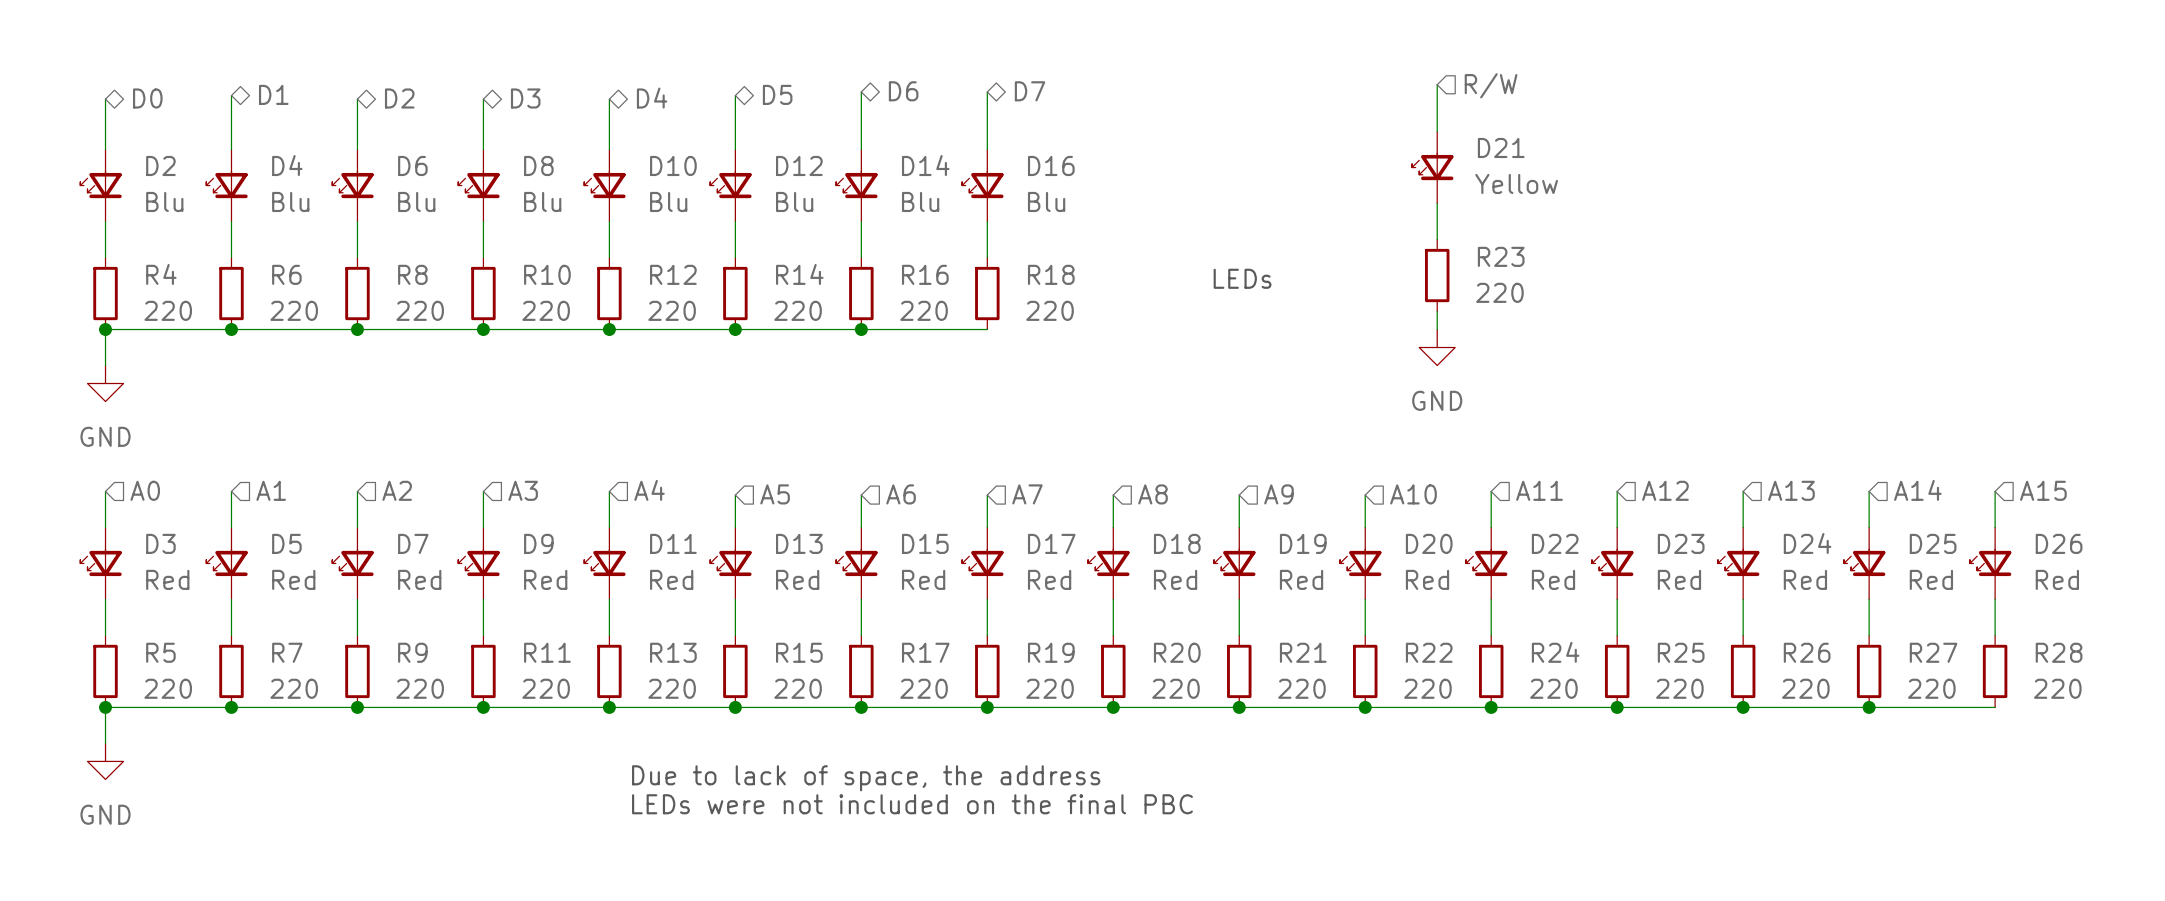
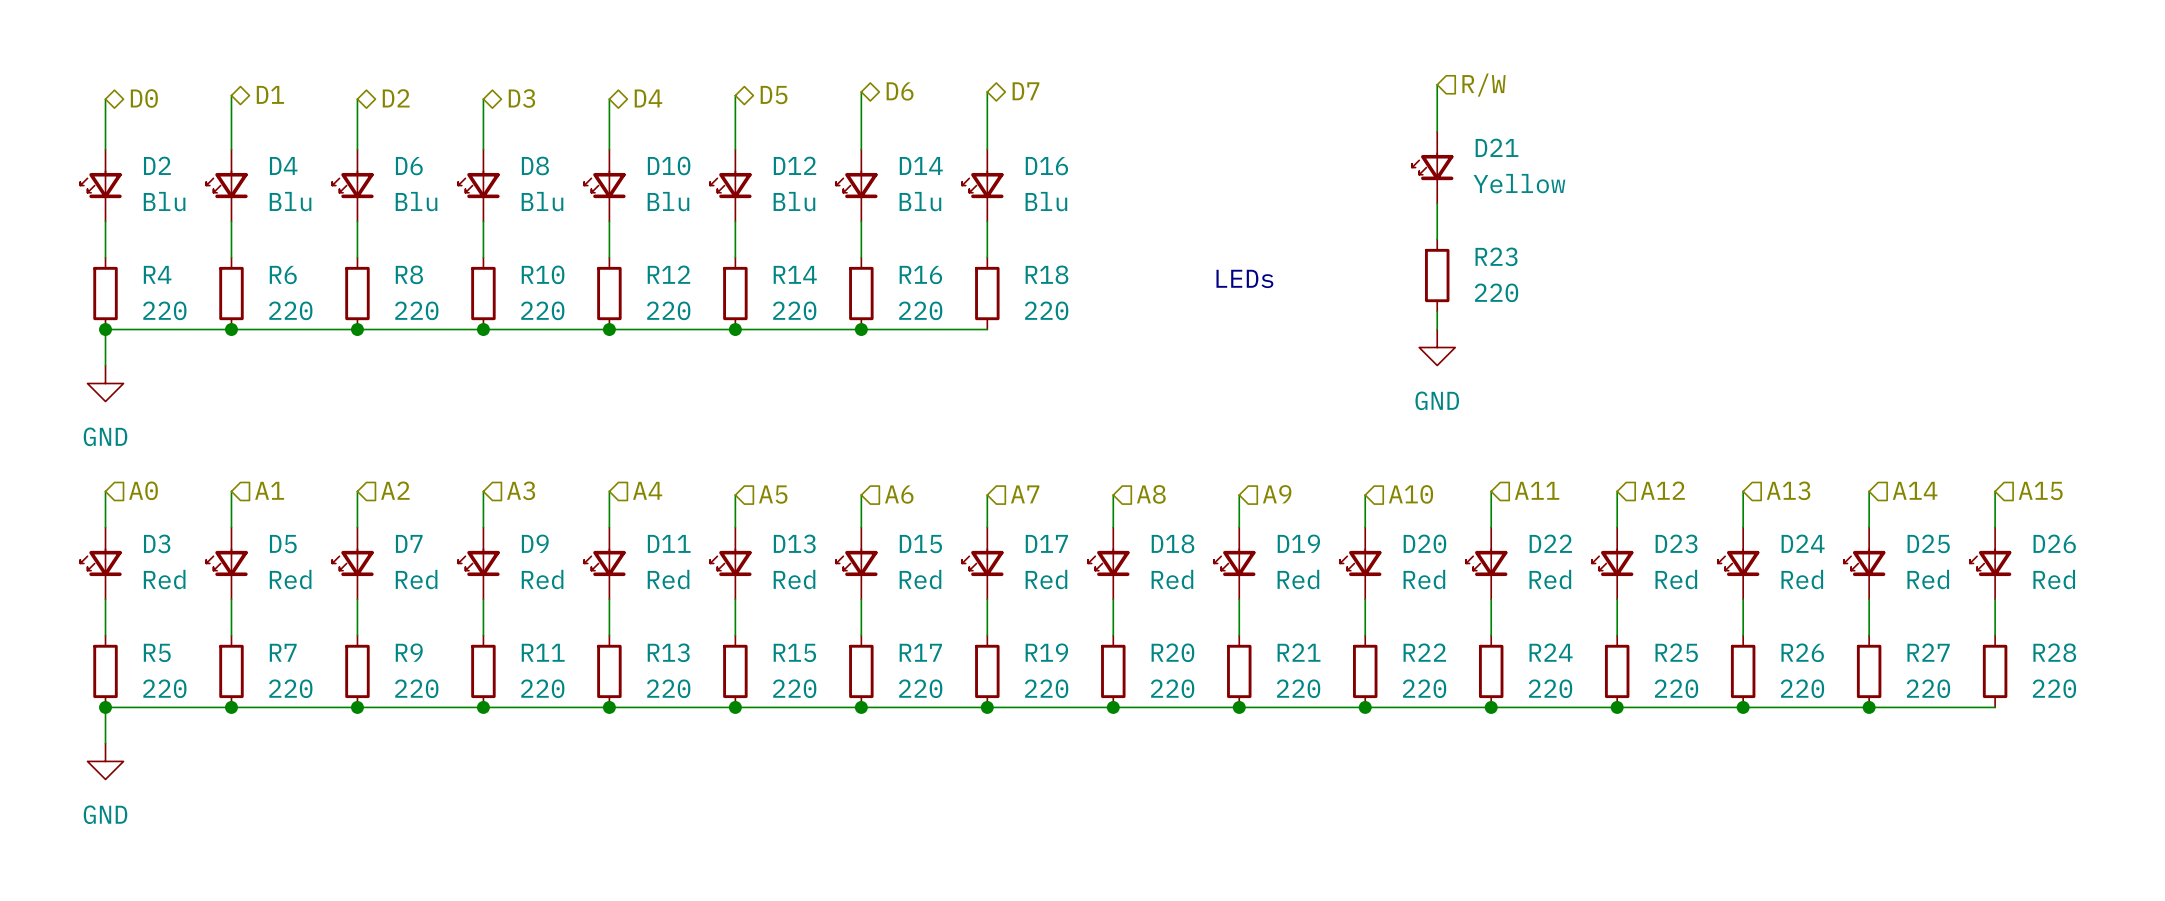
text: Due to lack of space, the address (866, 778) -> none
text: LEDs were not included on the final PBC (912, 804) -> none

